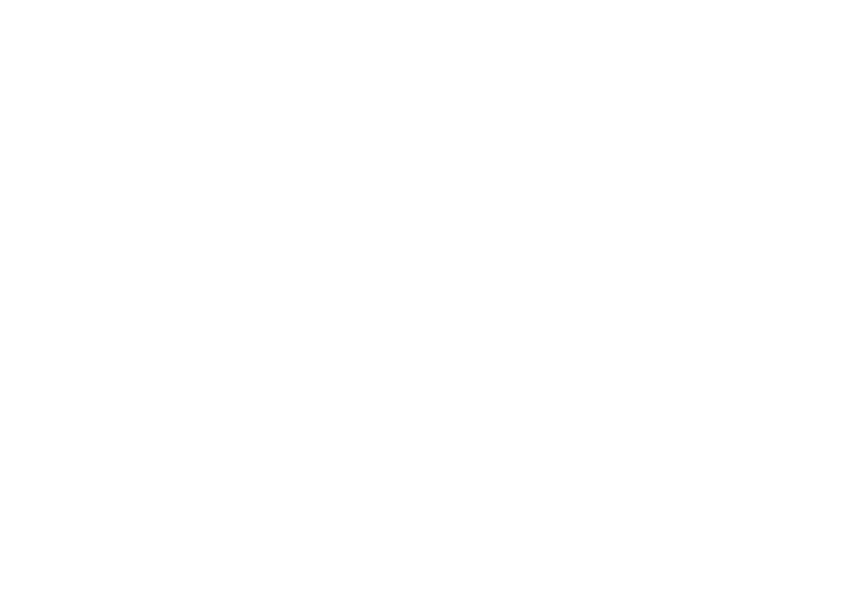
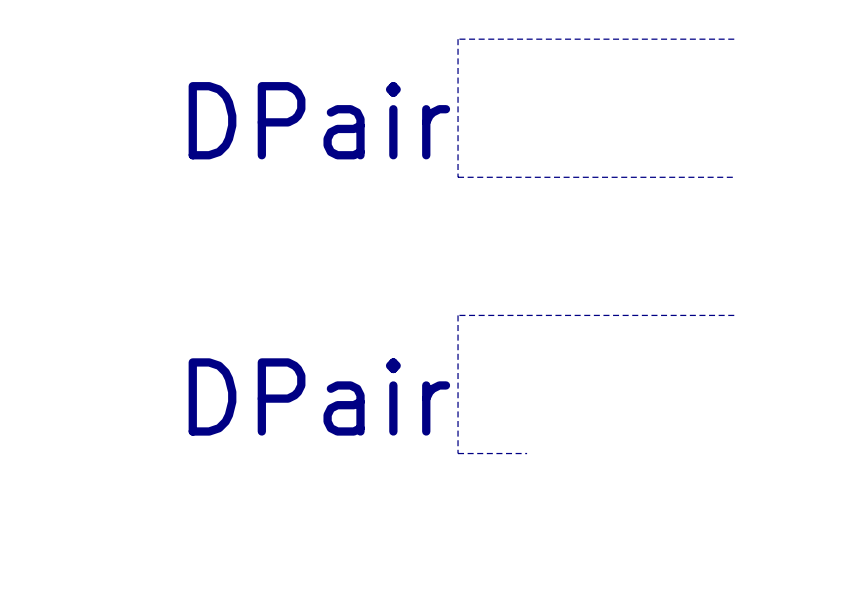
line: none -> (734, 39) (458, 39) (458, 177) (734, 177)
text: none -> DPair (319, 120)
line: none -> (734, 315) (458, 315) (458, 453) (527, 453)
text: none -> DPair (319, 396)

